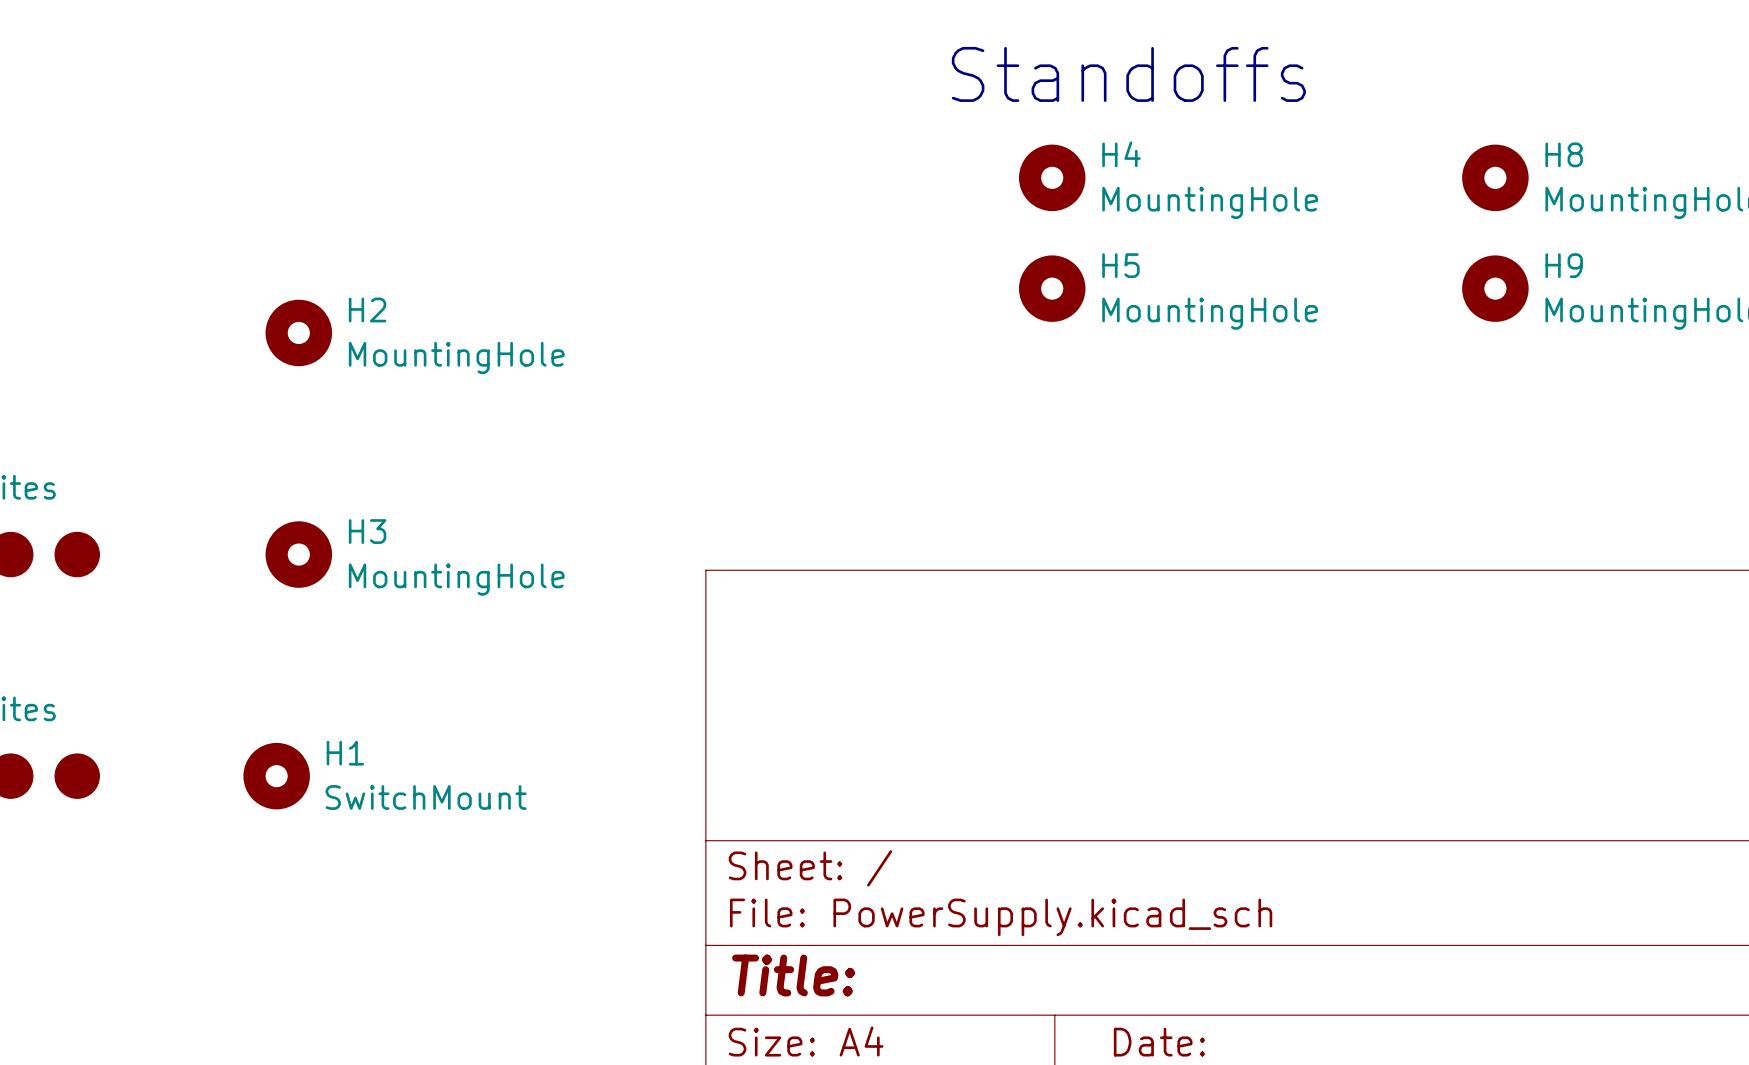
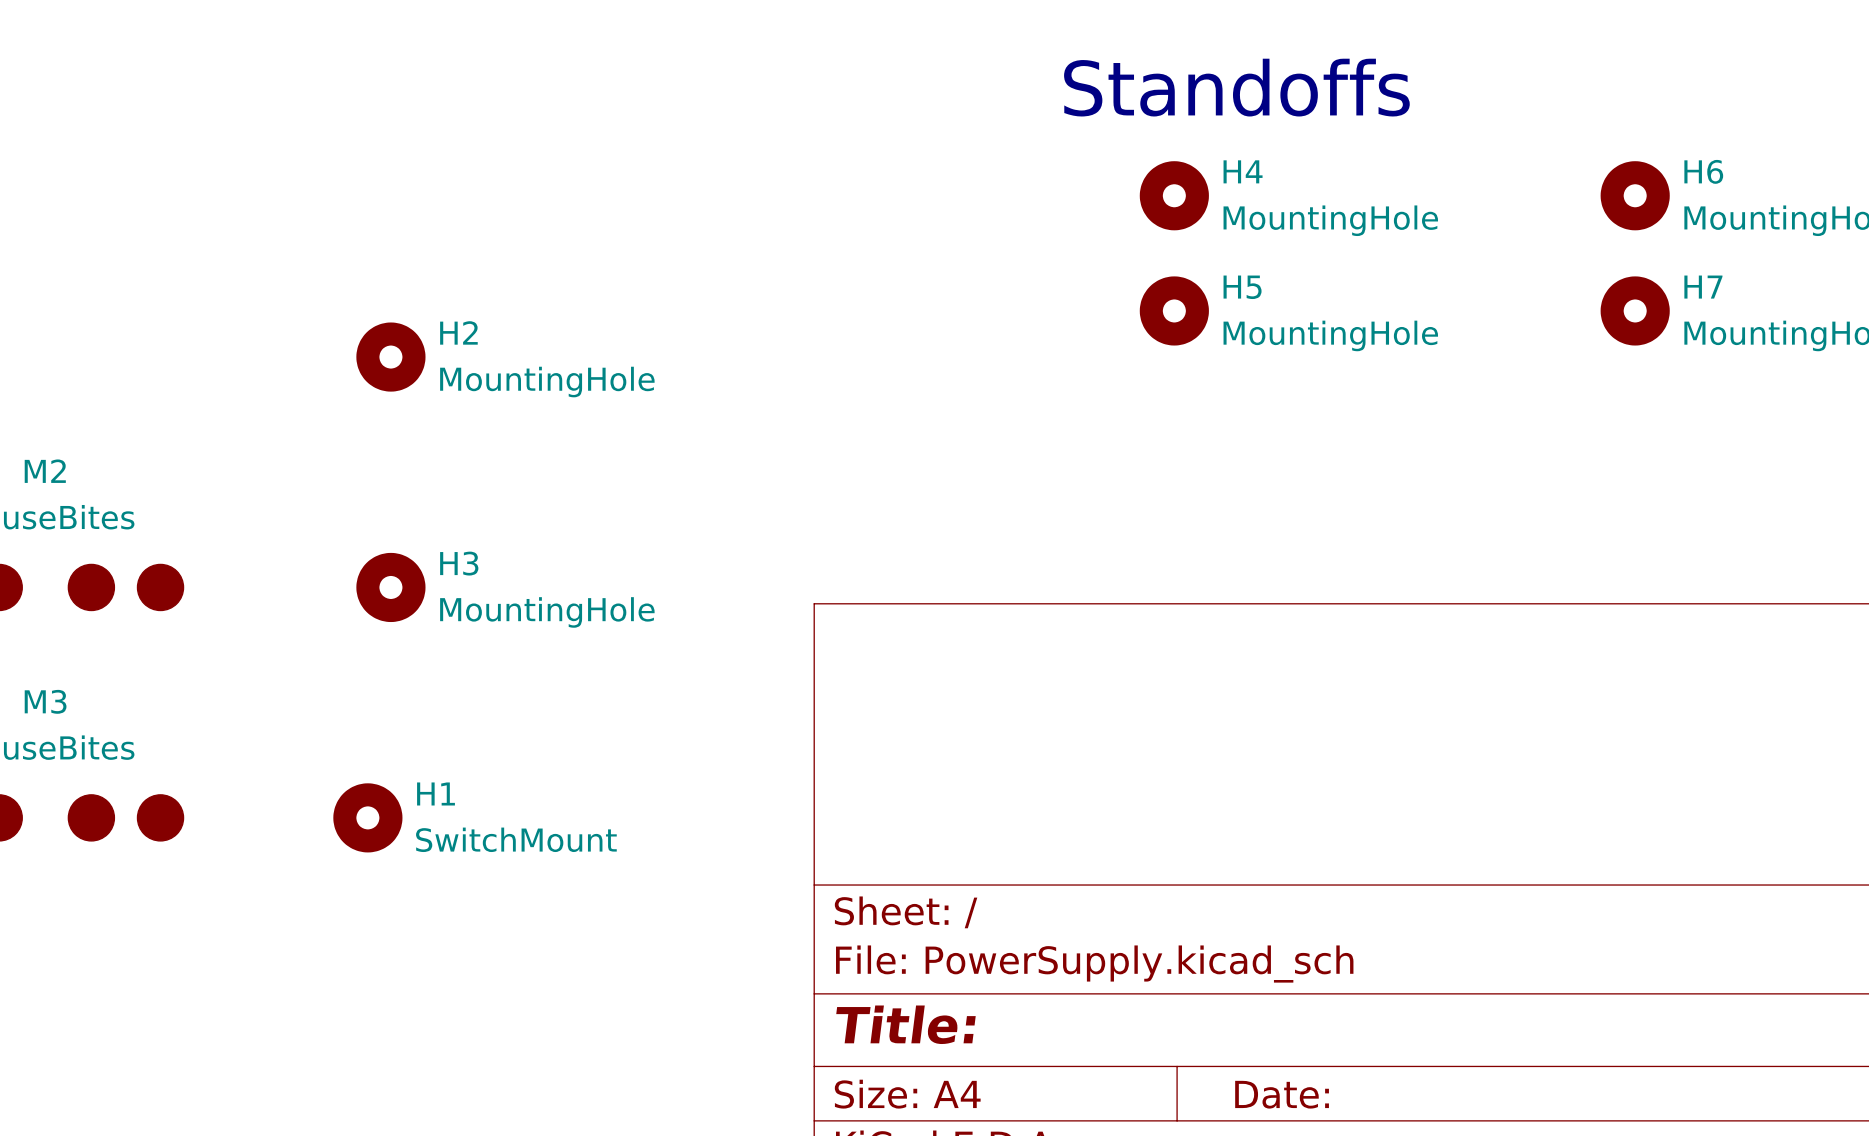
H8 name: H8 (1564, 154) -> H6 (1703, 171)
H9 name: H9 (1564, 265) -> H7 (1703, 287)

